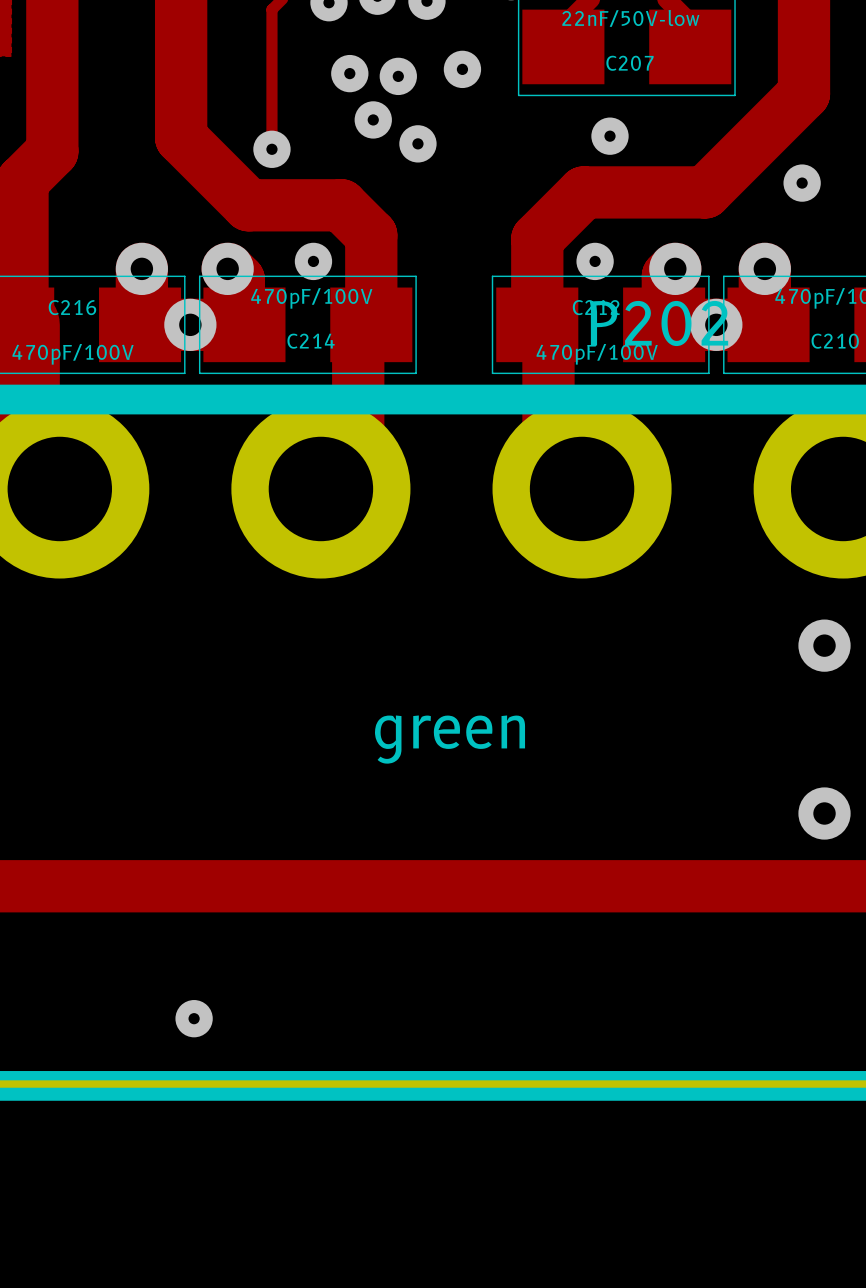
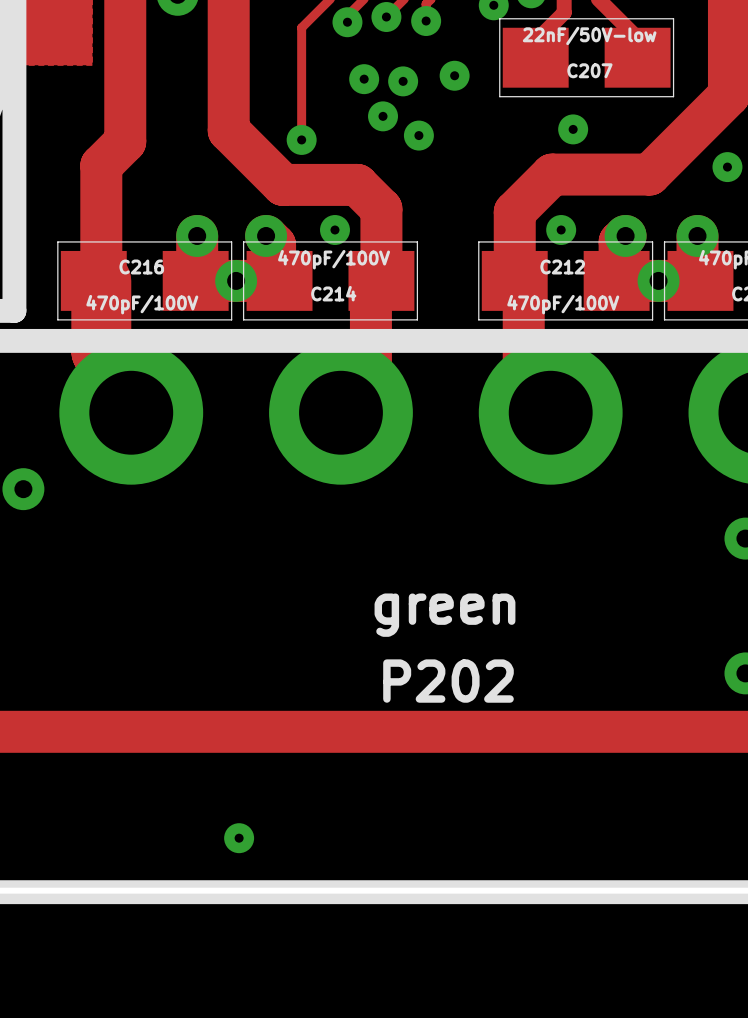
P202 name position: P202 (659, 323) -> P202 (448, 681)

